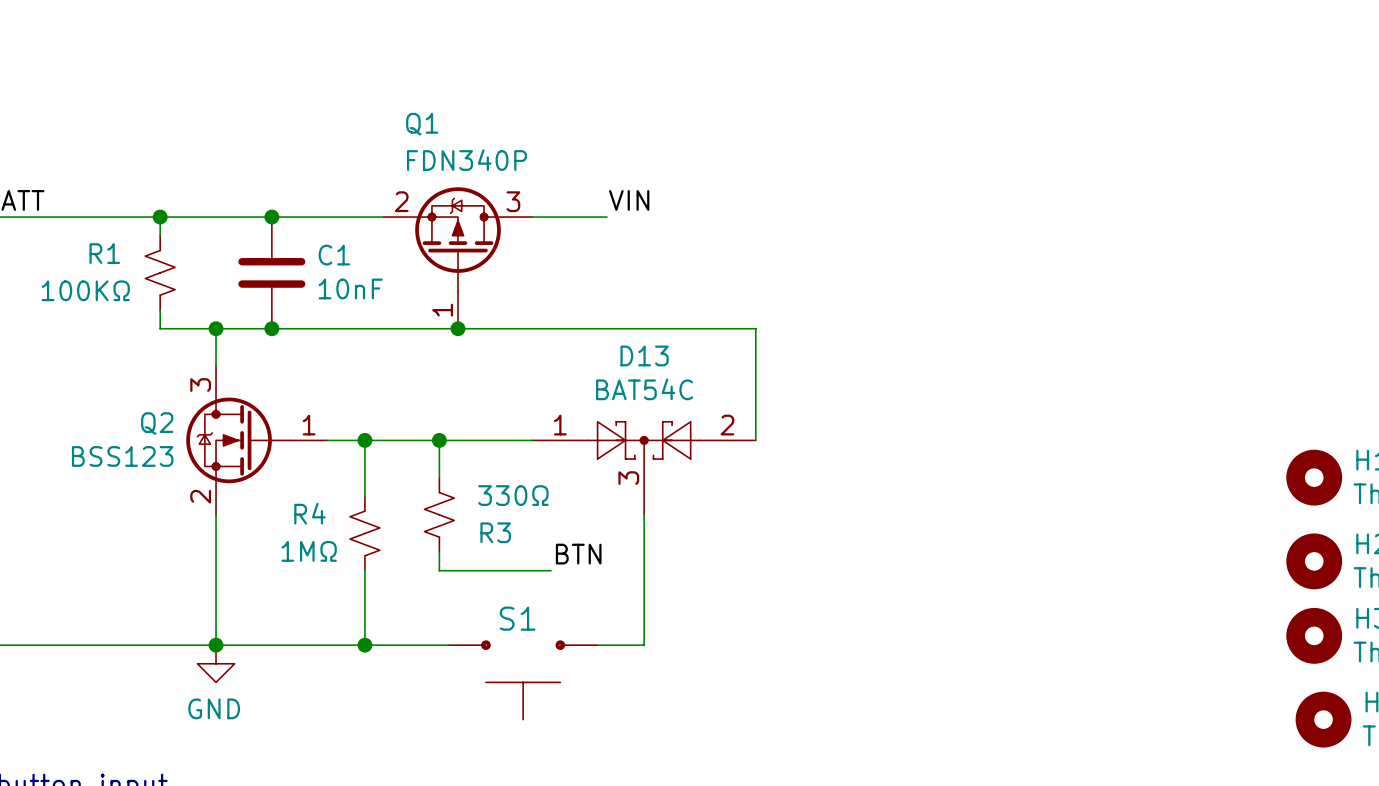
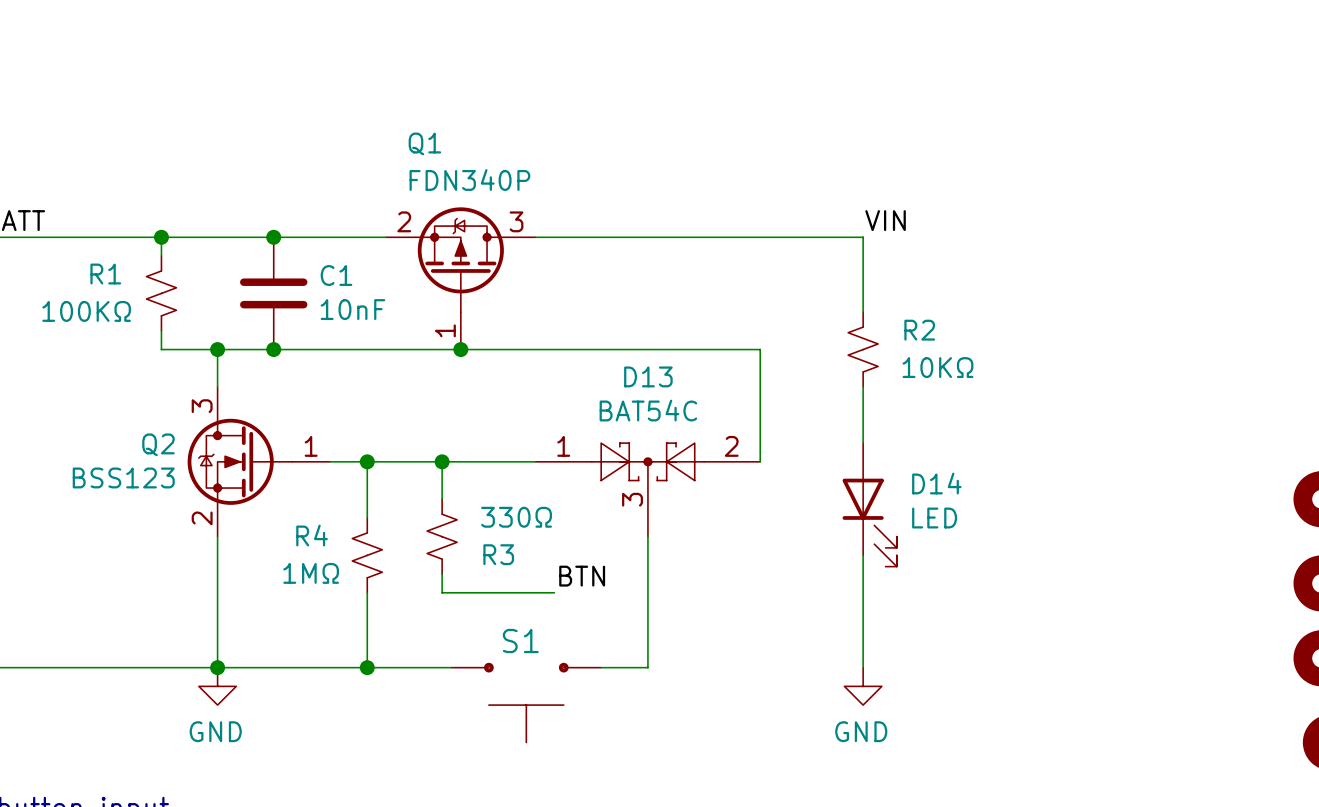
label position: VIN (629, 200) -> VIN (885, 220)
wire: none -> (610, 237) (863, 237) (863, 312)
R2: none -> 10KΩ (863, 349)
wire: none -> (863, 386) (863, 443)
D14: none -> LED (869, 504)
wire: none -> (863, 555) (863, 667)
power symbol: none -> GND (863, 686)

